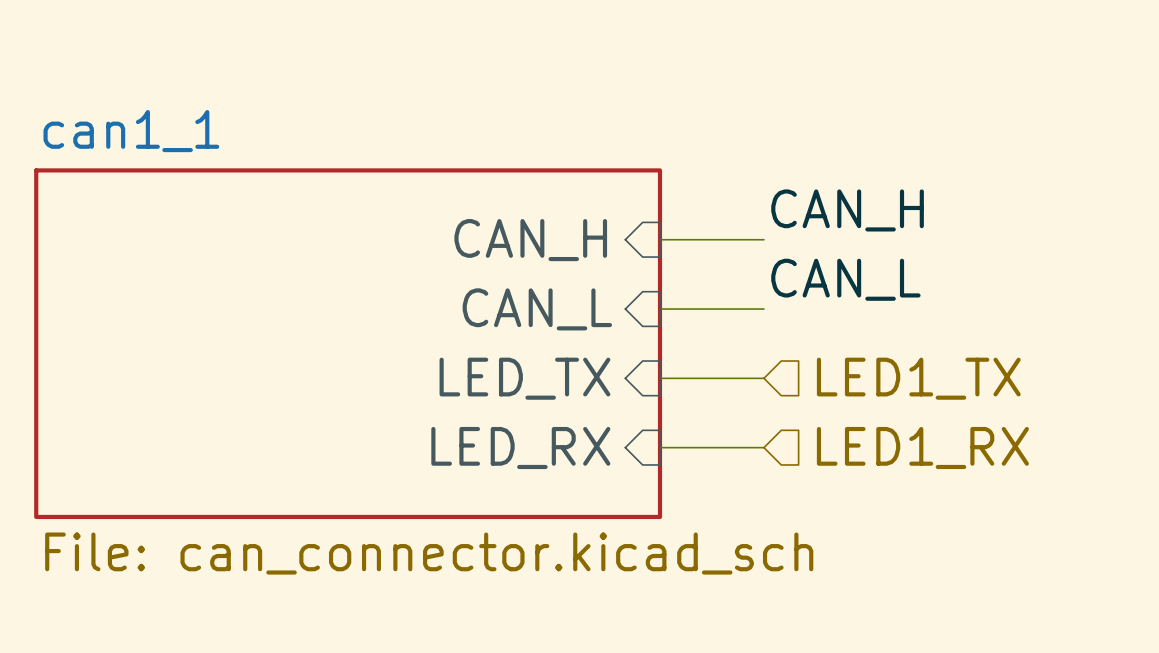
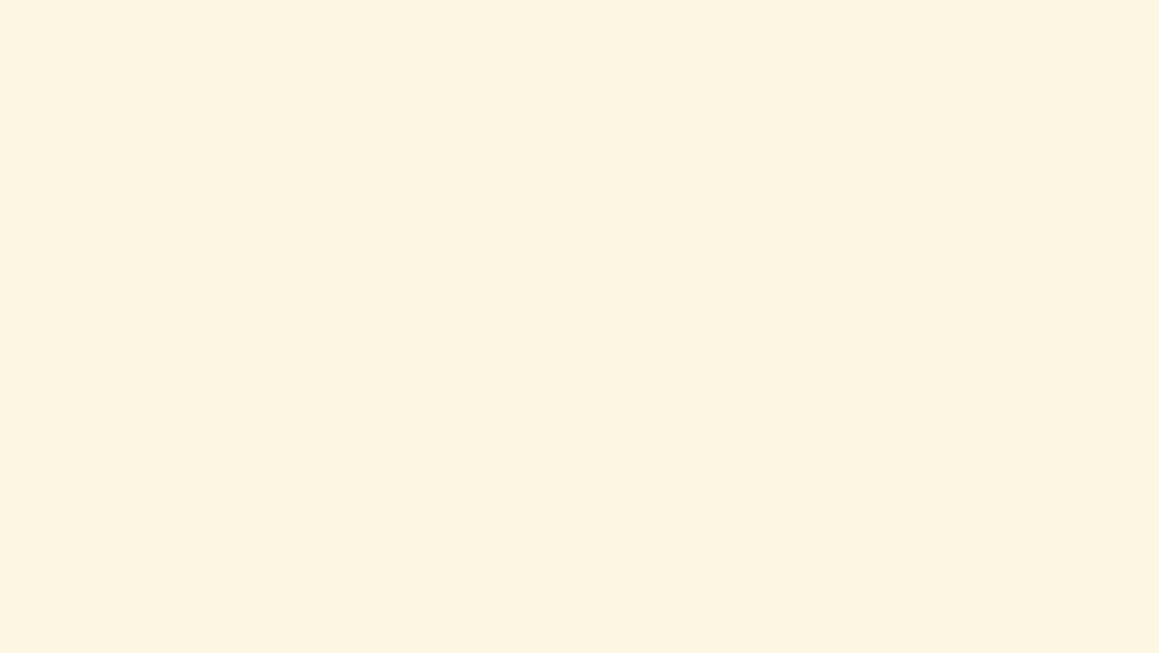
label: CAN_H (847, 210) -> none
wire: (659, 239) (763, 239) -> none
sheet pin: CAN_H (530, 240) -> none
label: CAN_L (845, 279) -> none
sheet pin: CAN_L (537, 309) -> none
wire: (659, 309) (763, 309) -> none
sheet can1_1: File: can_connector.kicad_sch (348, 343) -> none
sheet pin: LED_TX (524, 378) -> none
wire: (659, 378) (763, 378) -> none
hierarchical label: LED1_TX (918, 378) -> none
wire: (659, 447) (763, 447) -> none
sheet pin: LED_RX (520, 448) -> none
hierarchical label: LED1_RX (922, 448) -> none

